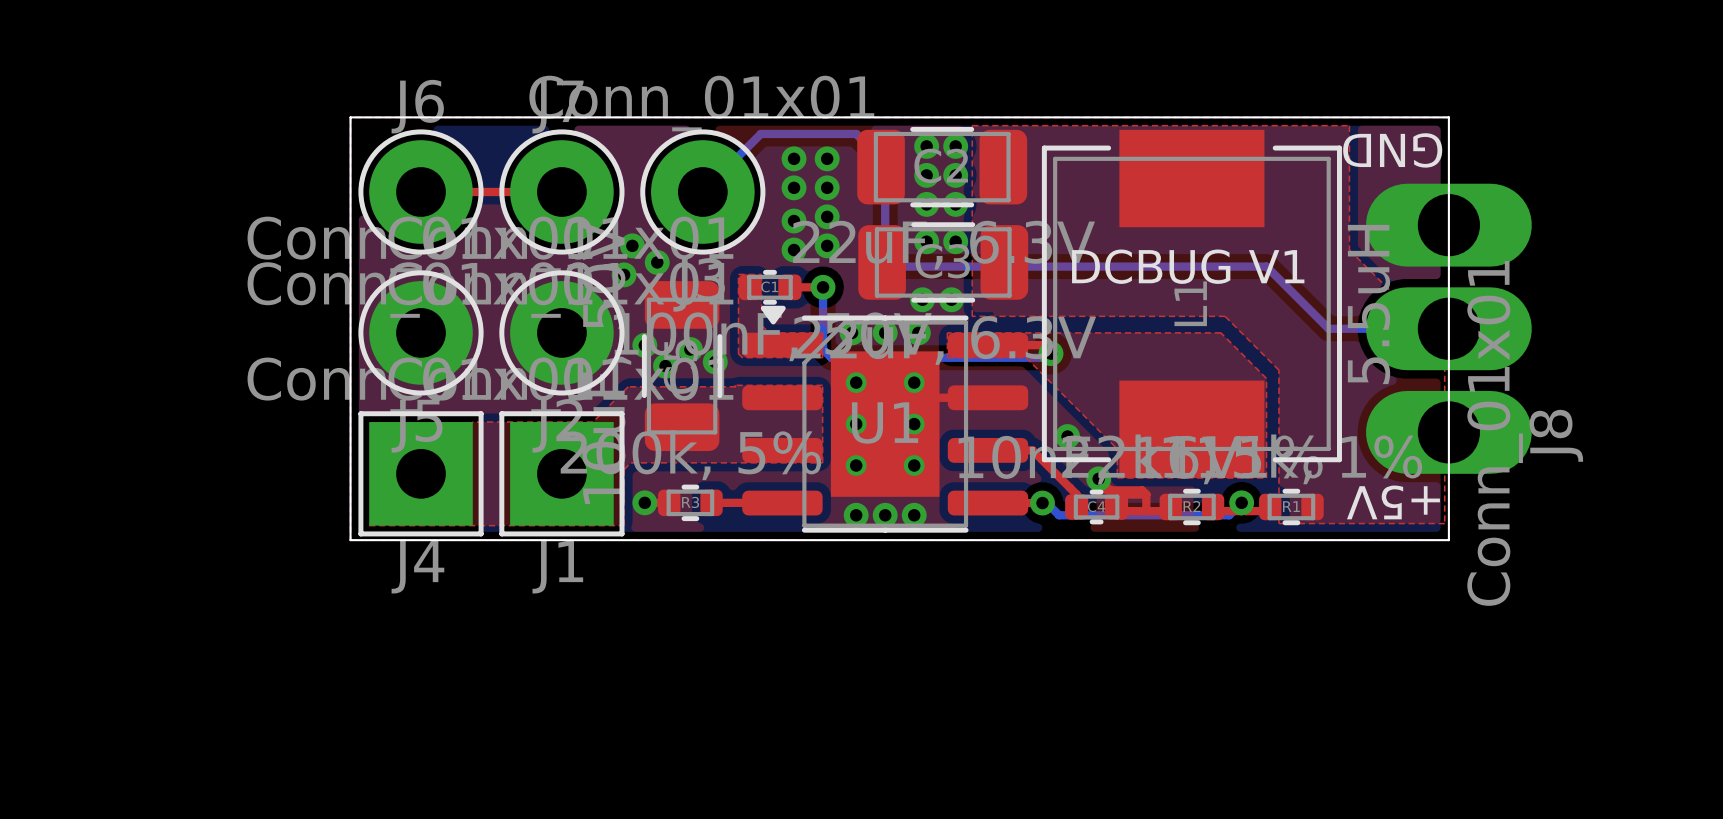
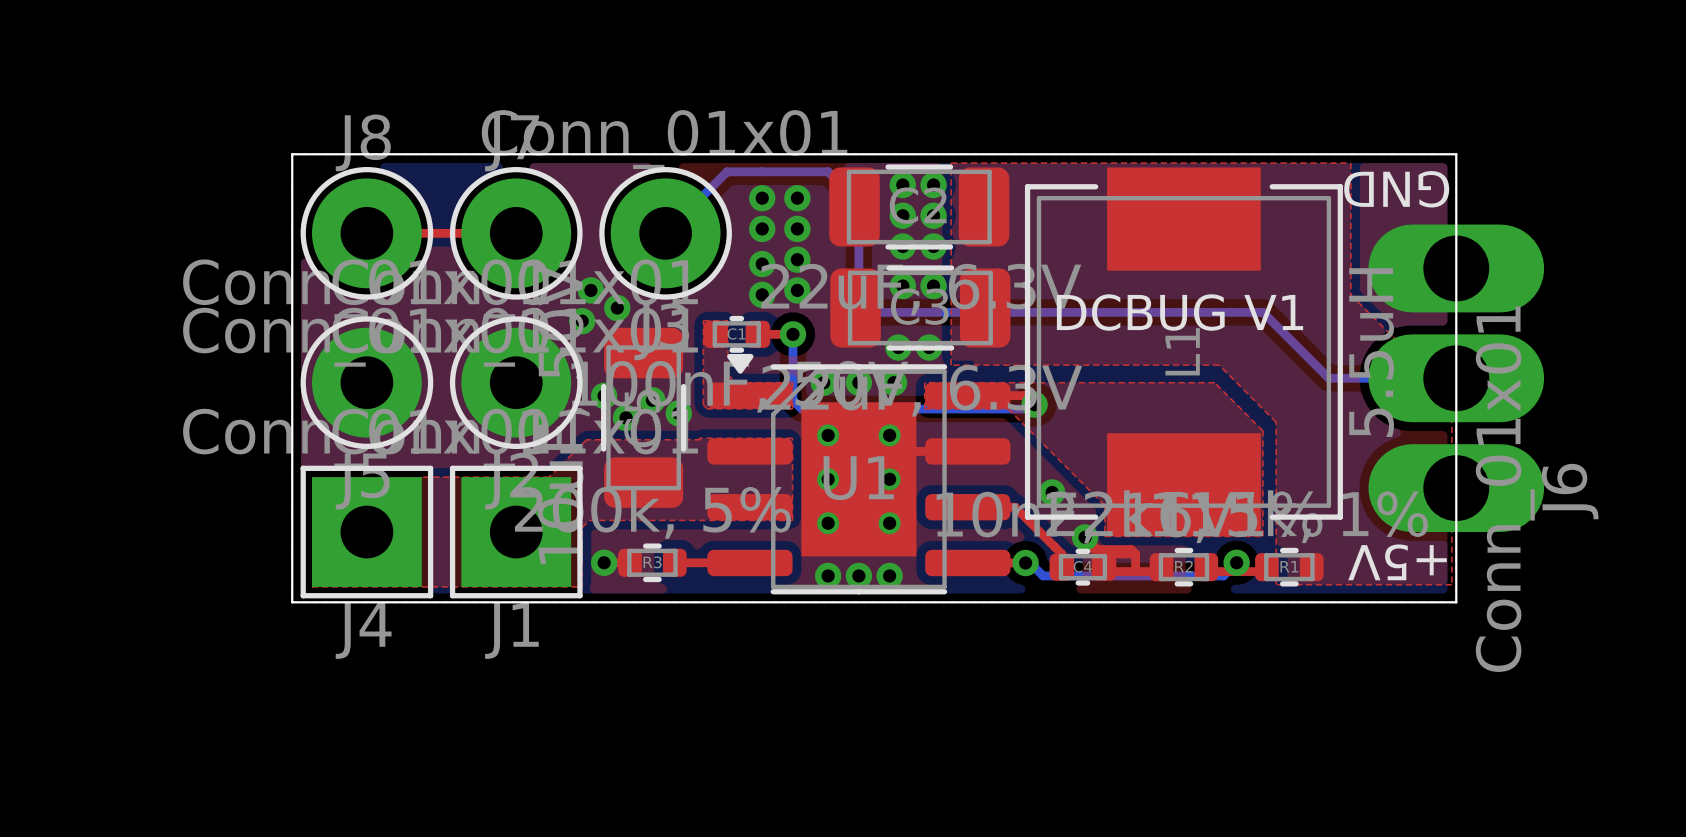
J6 name: J6 (417, 106) -> J8 (363, 142)
J8 name: J8 (1556, 435) -> J6 (1570, 491)

